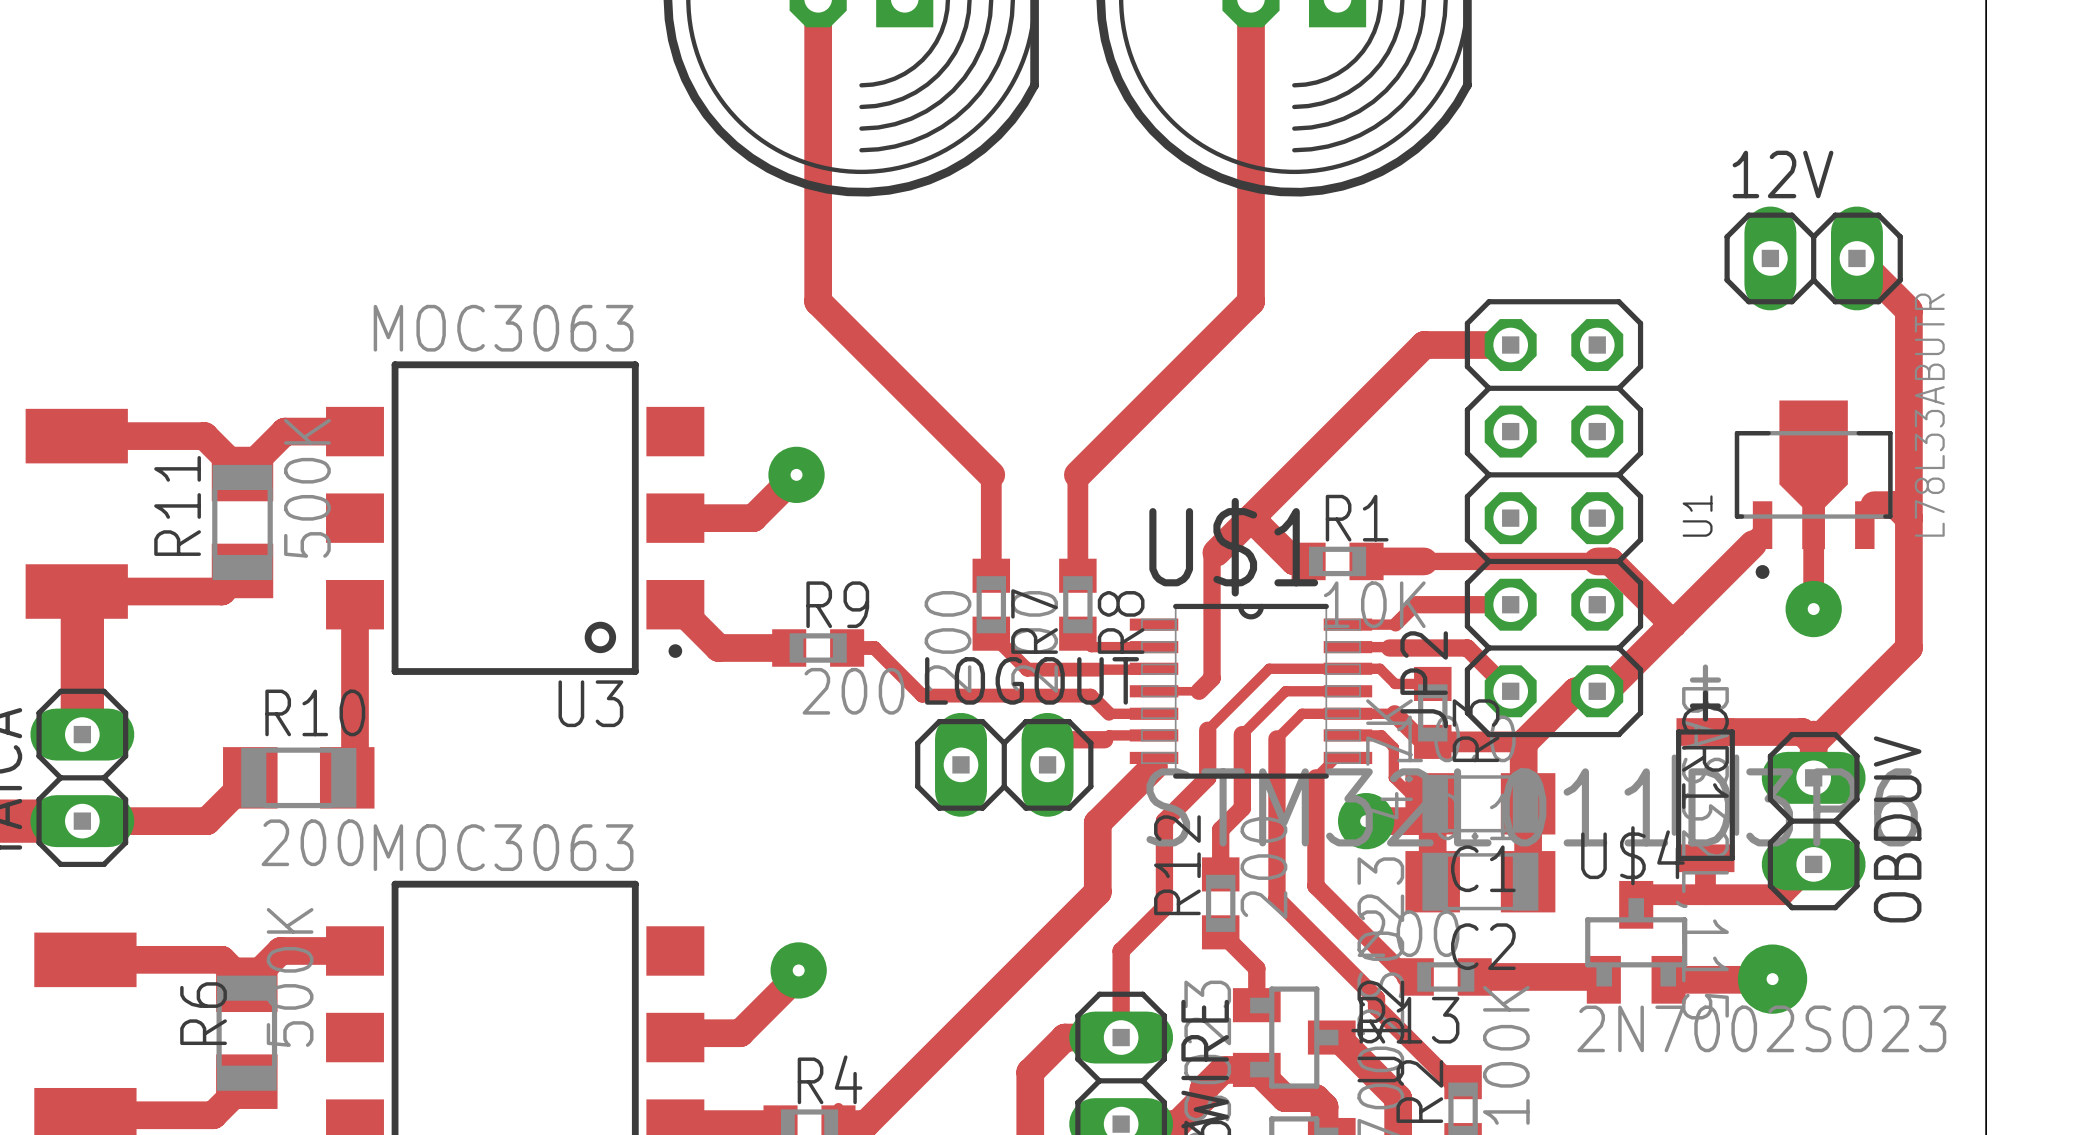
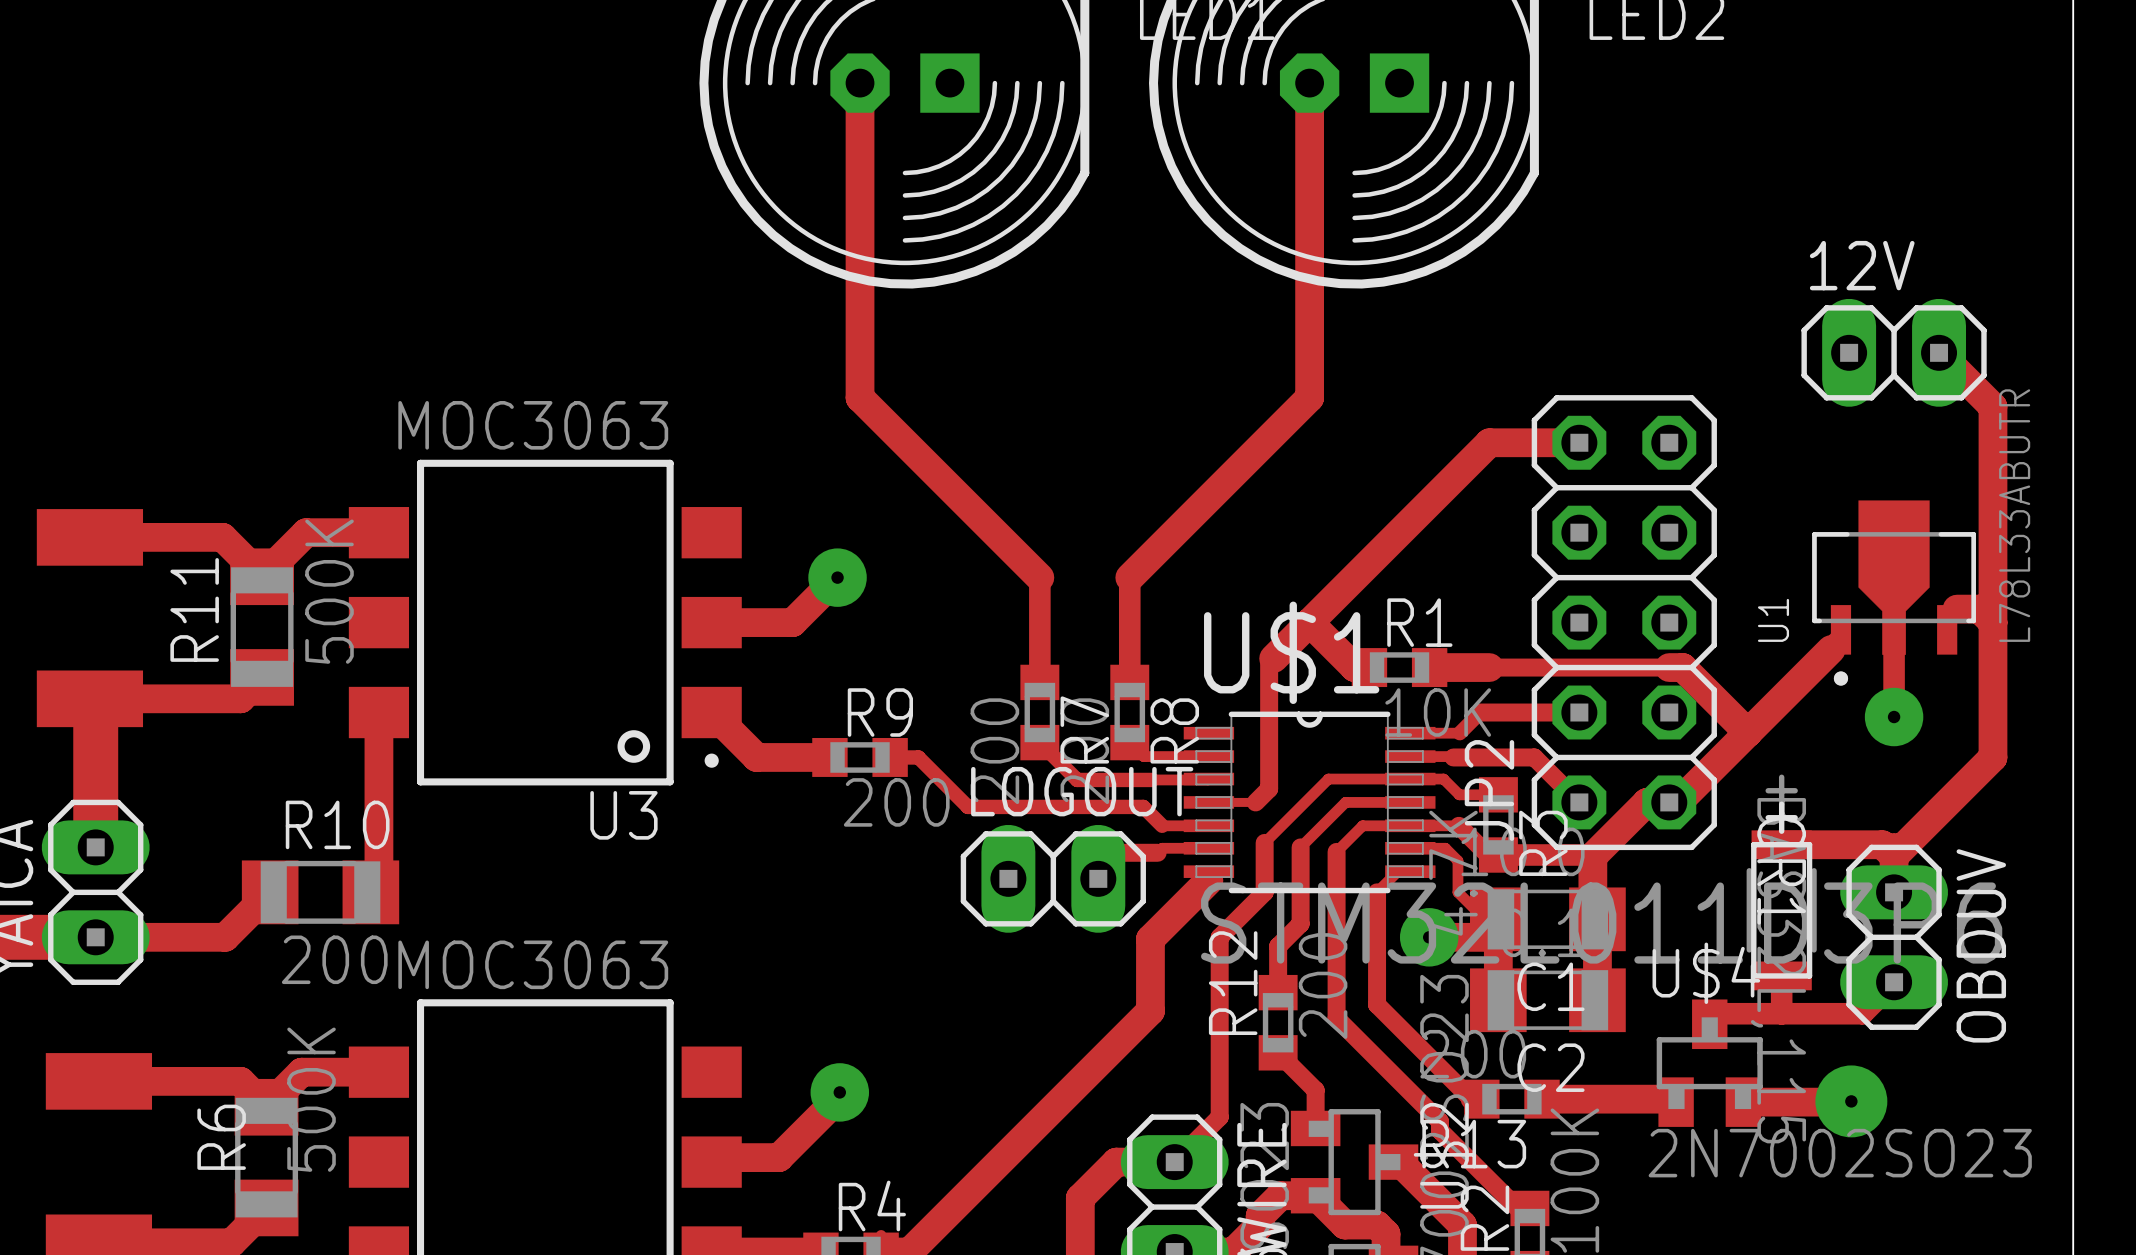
track: (1164, 907) (1121, 950) (1121, 1037) -> (1219, 1027) (1219, 1117) (1174, 1162)

